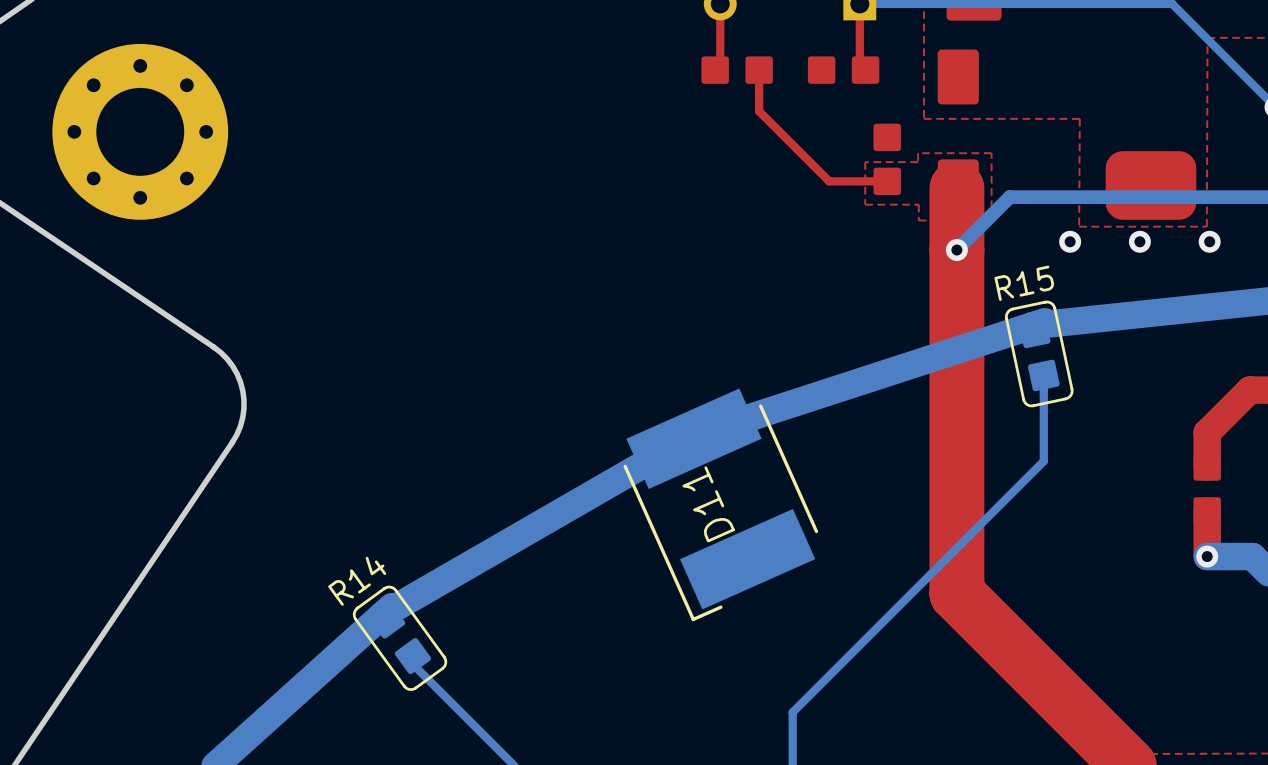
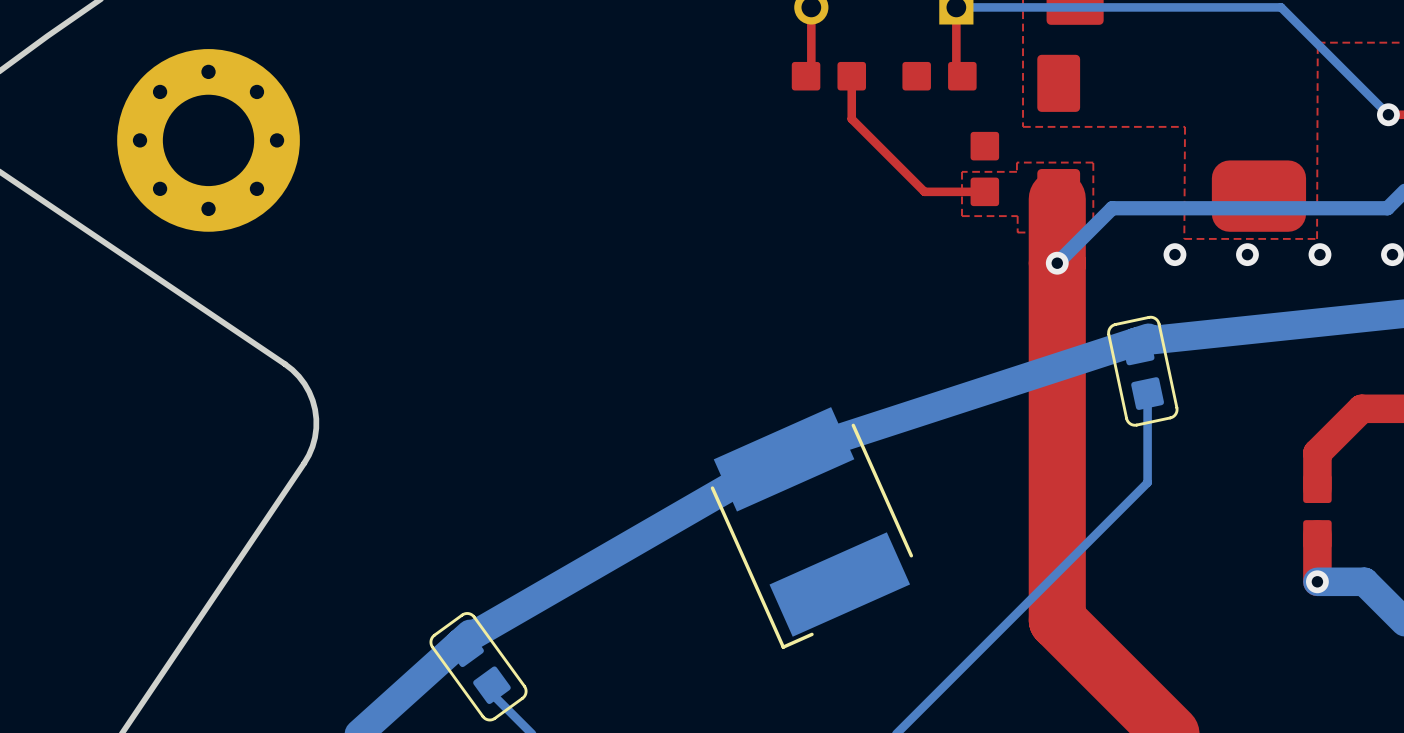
R15 name: R15 (1024, 283) -> none
D11 name: D11 (708, 504) -> none
R14 name: R14 (357, 581) -> none

